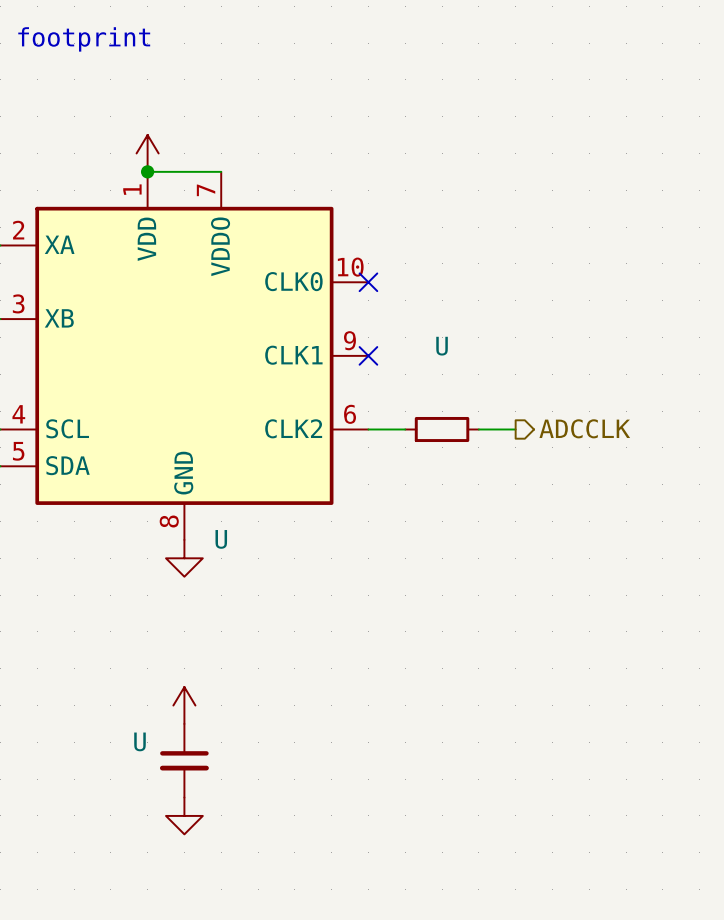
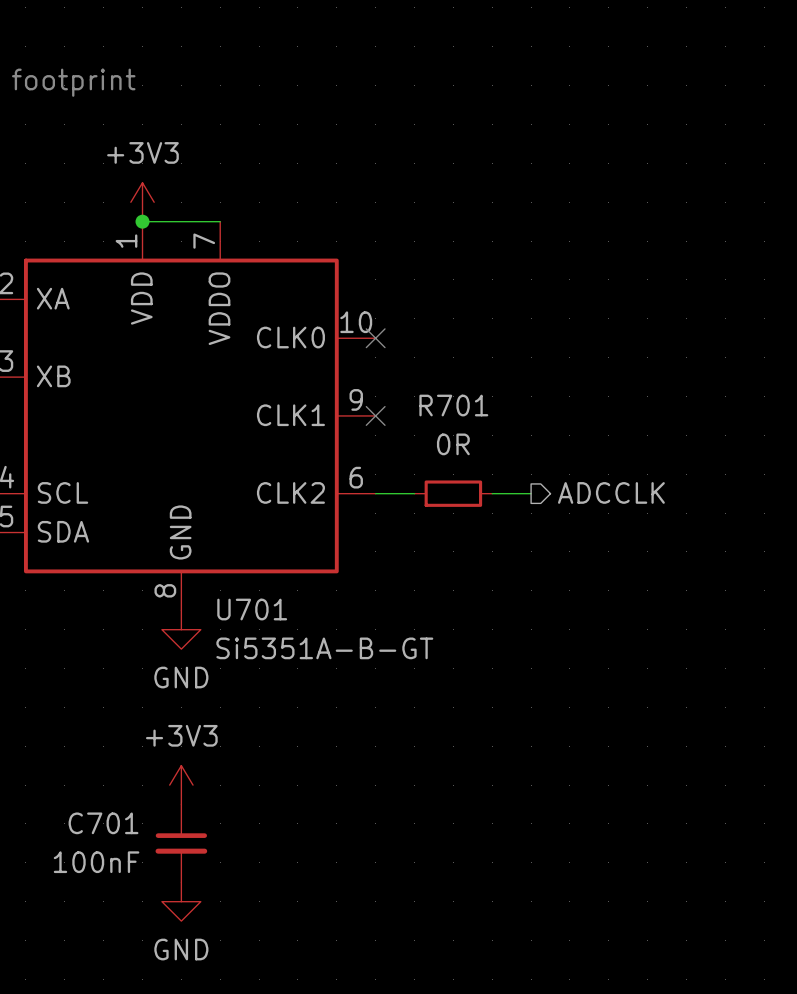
power symbol text: none -> +3V3 (142, 152)
U name: U (442, 346) -> R701 (453, 405)
U value: none -> 0R (453, 444)
U name: U (221, 539) -> U701 (252, 609)
U value: none -> Si5351A-B-GT (324, 648)
power symbol text: none -> GND (181, 677)
power symbol text: none -> +3V3 (181, 735)
U name: U (140, 741) -> C701 (103, 823)
U value: none -> 100nF (96, 862)
power symbol text: none -> GND (181, 949)

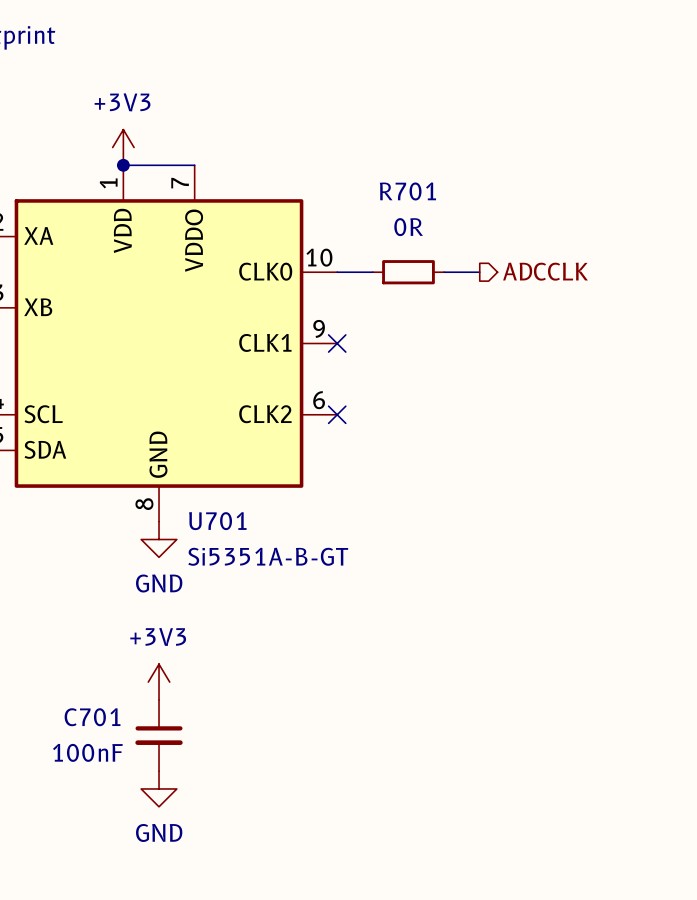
no-connect mark: (375, 338) -> none
hierarchical label position: ADCCLK (611, 492) -> ADCCLK (545, 271)
wire: (375, 493) (414, 493) -> (337, 272) (372, 272)
no-connect mark: none -> (337, 414)
R701 position: (453, 493) -> (408, 272)
wire: (492, 493) (531, 493) -> (444, 272) (479, 272)

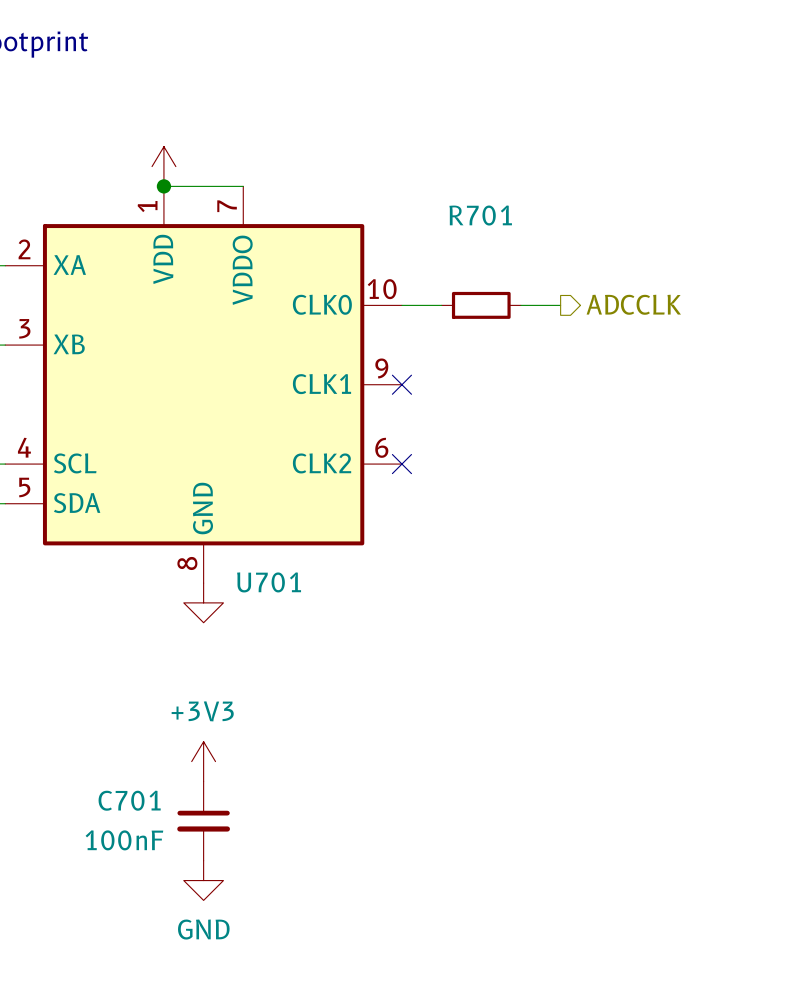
power symbol text: +3V3 (122, 102) -> none
R701 value: 0R (408, 227) -> none
U701 value: Si5351A-B-GT (268, 556) -> none
power symbol text: GND (159, 583) -> none

